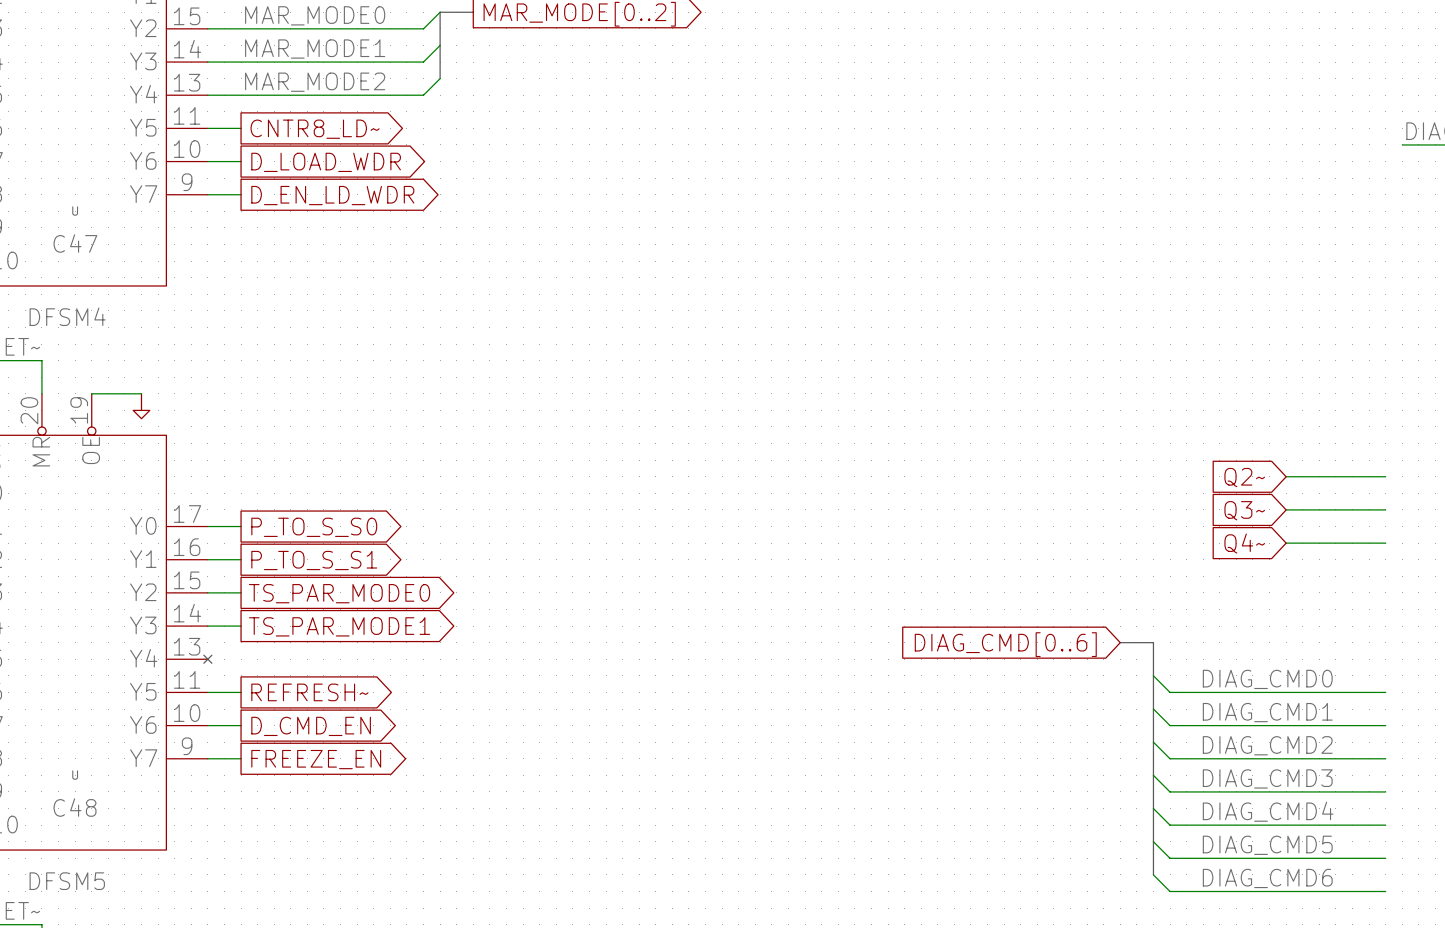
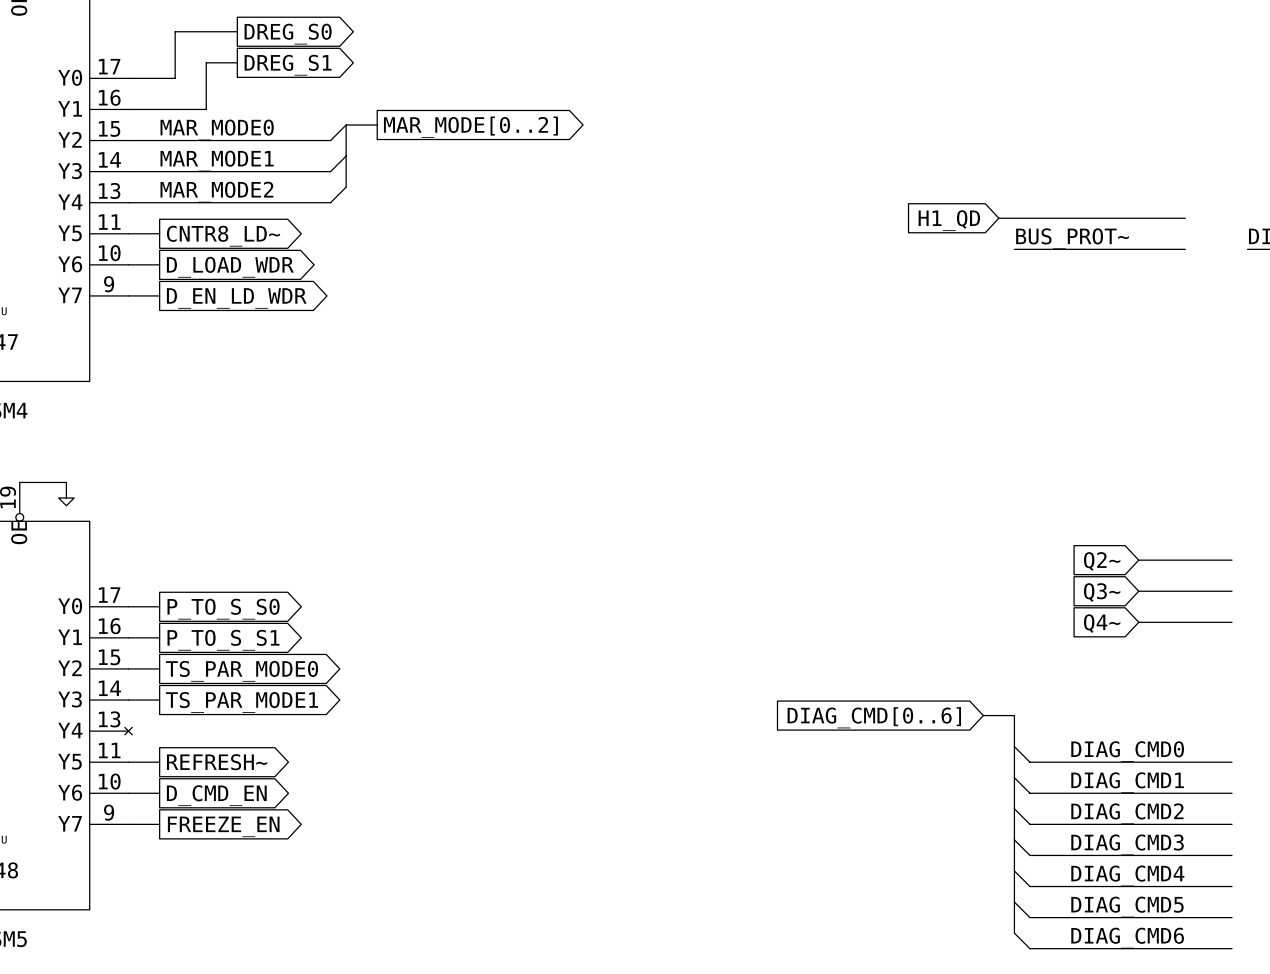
wire: none -> (998, 218) (1185, 218)
global label: none -> H1_QD (949, 220)
label: none -> BUS_PROT~ (1072, 238)
wire: none -> (1014, 249) (1185, 249)

